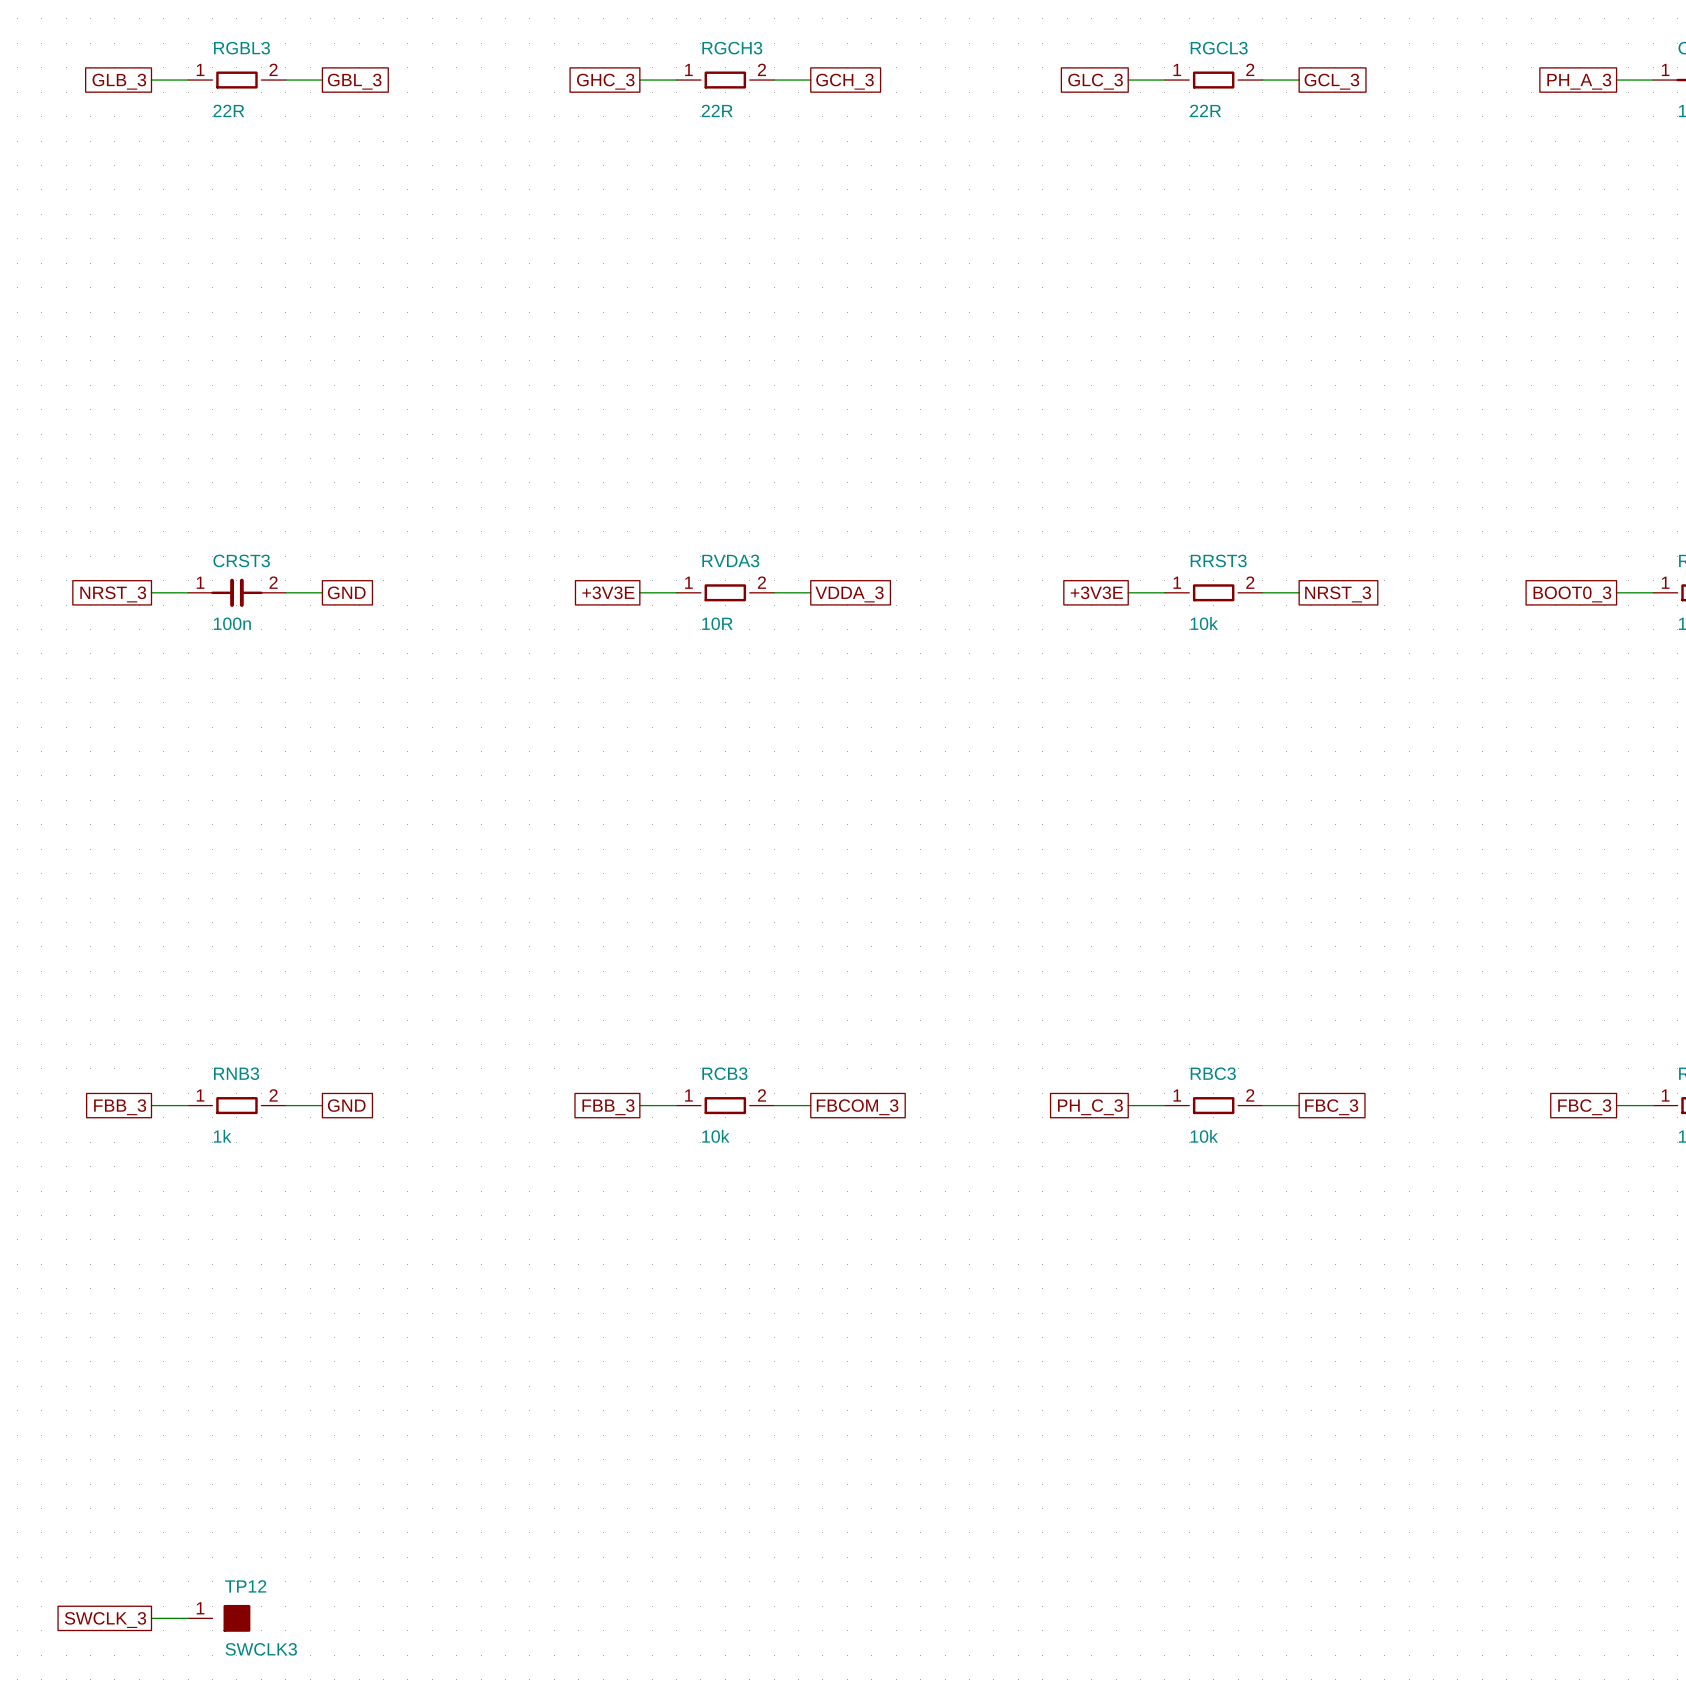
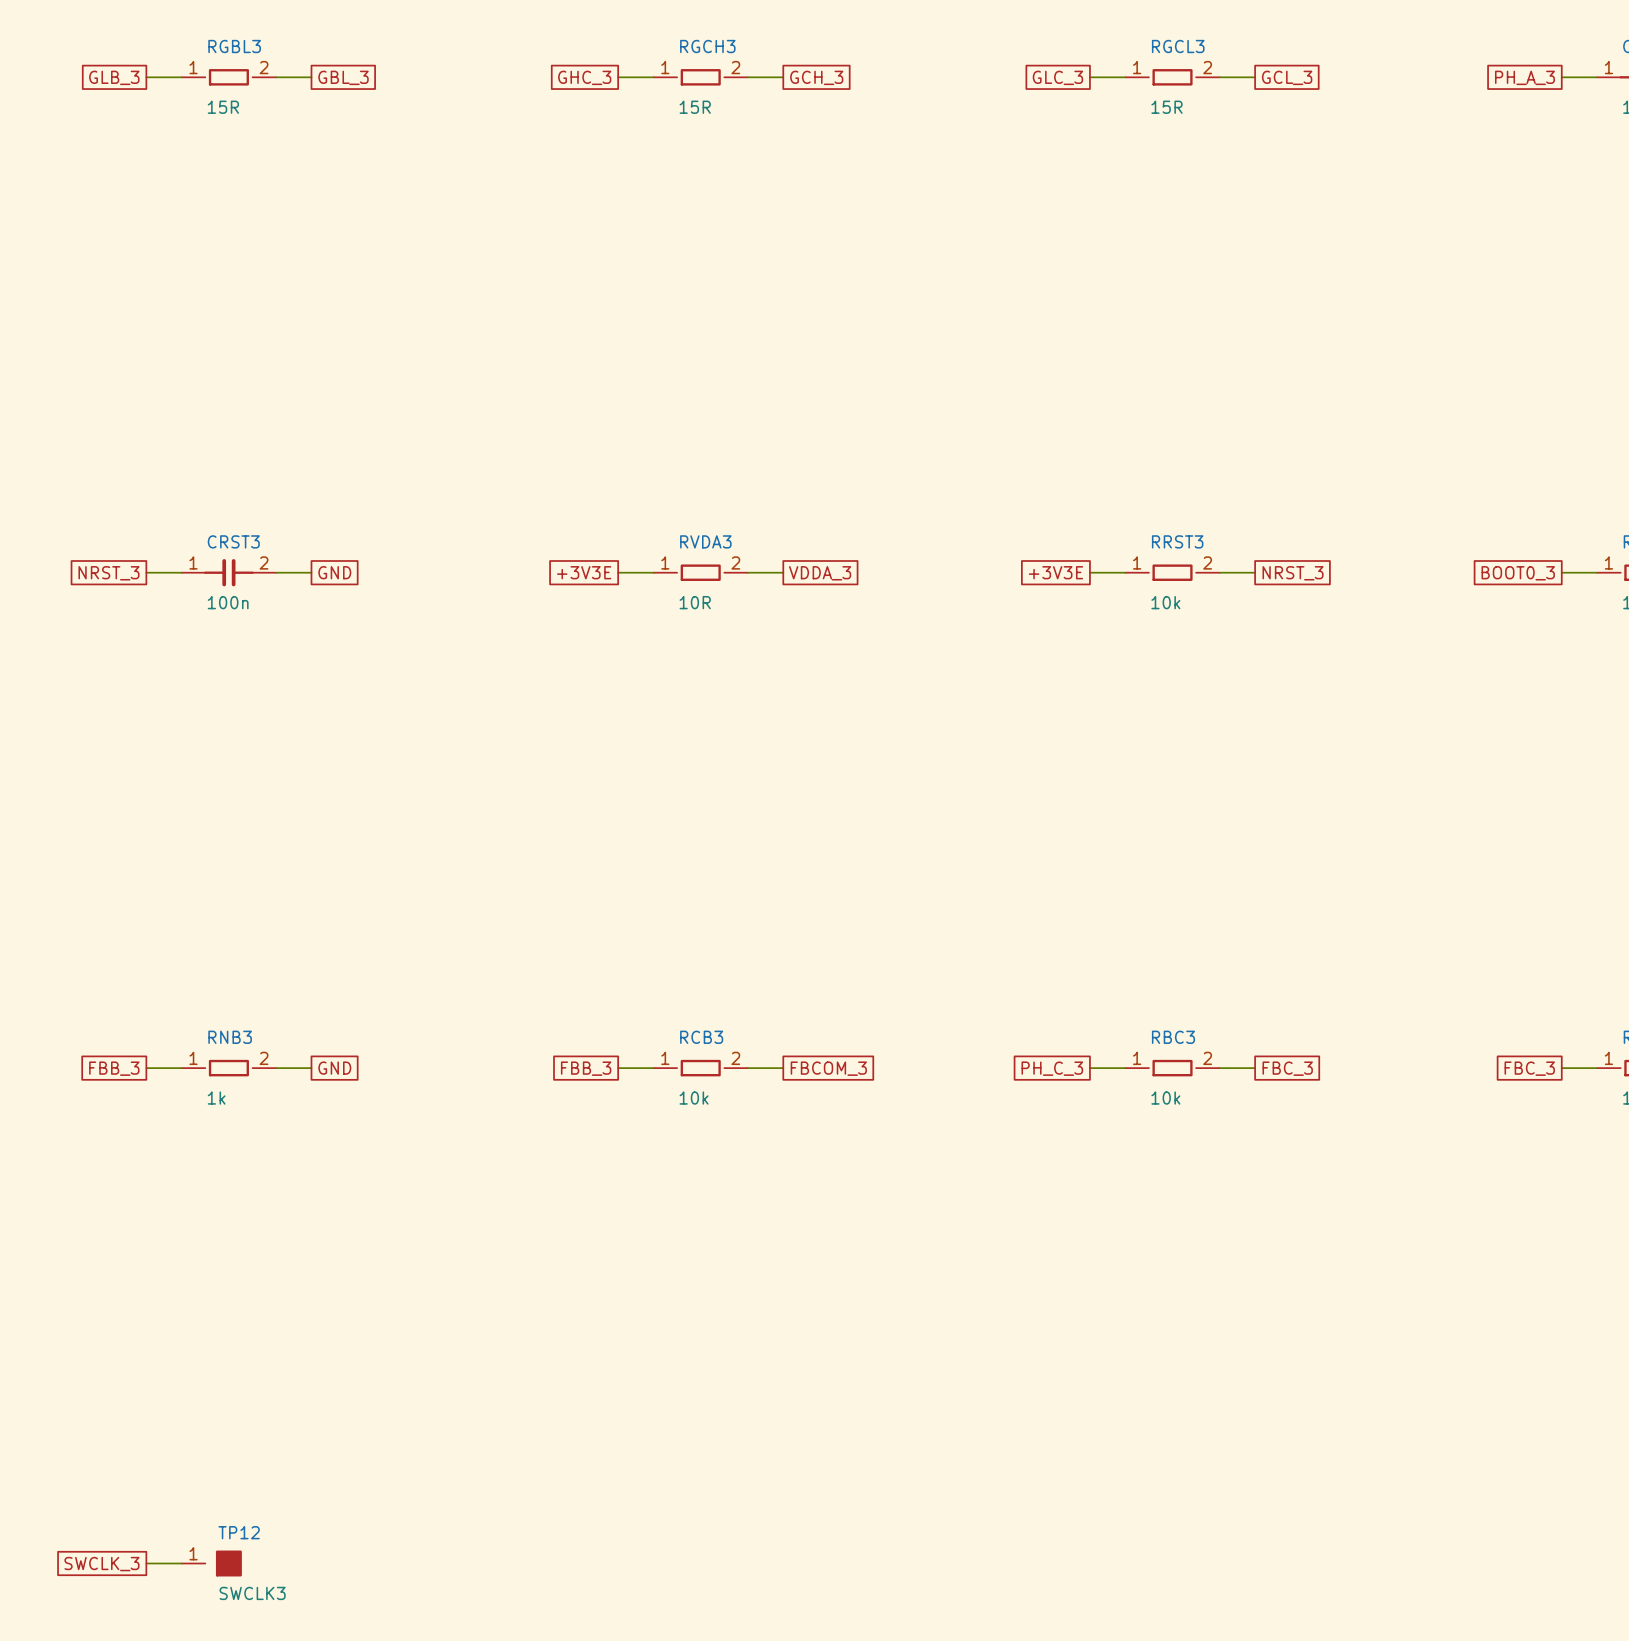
RGBL3 value: 22R (228, 110) -> 15R (223, 107)
RGCH3 value: 22R (717, 110) -> 15R (695, 107)
RGCL3 value: 22R (1205, 110) -> 15R (1167, 107)

